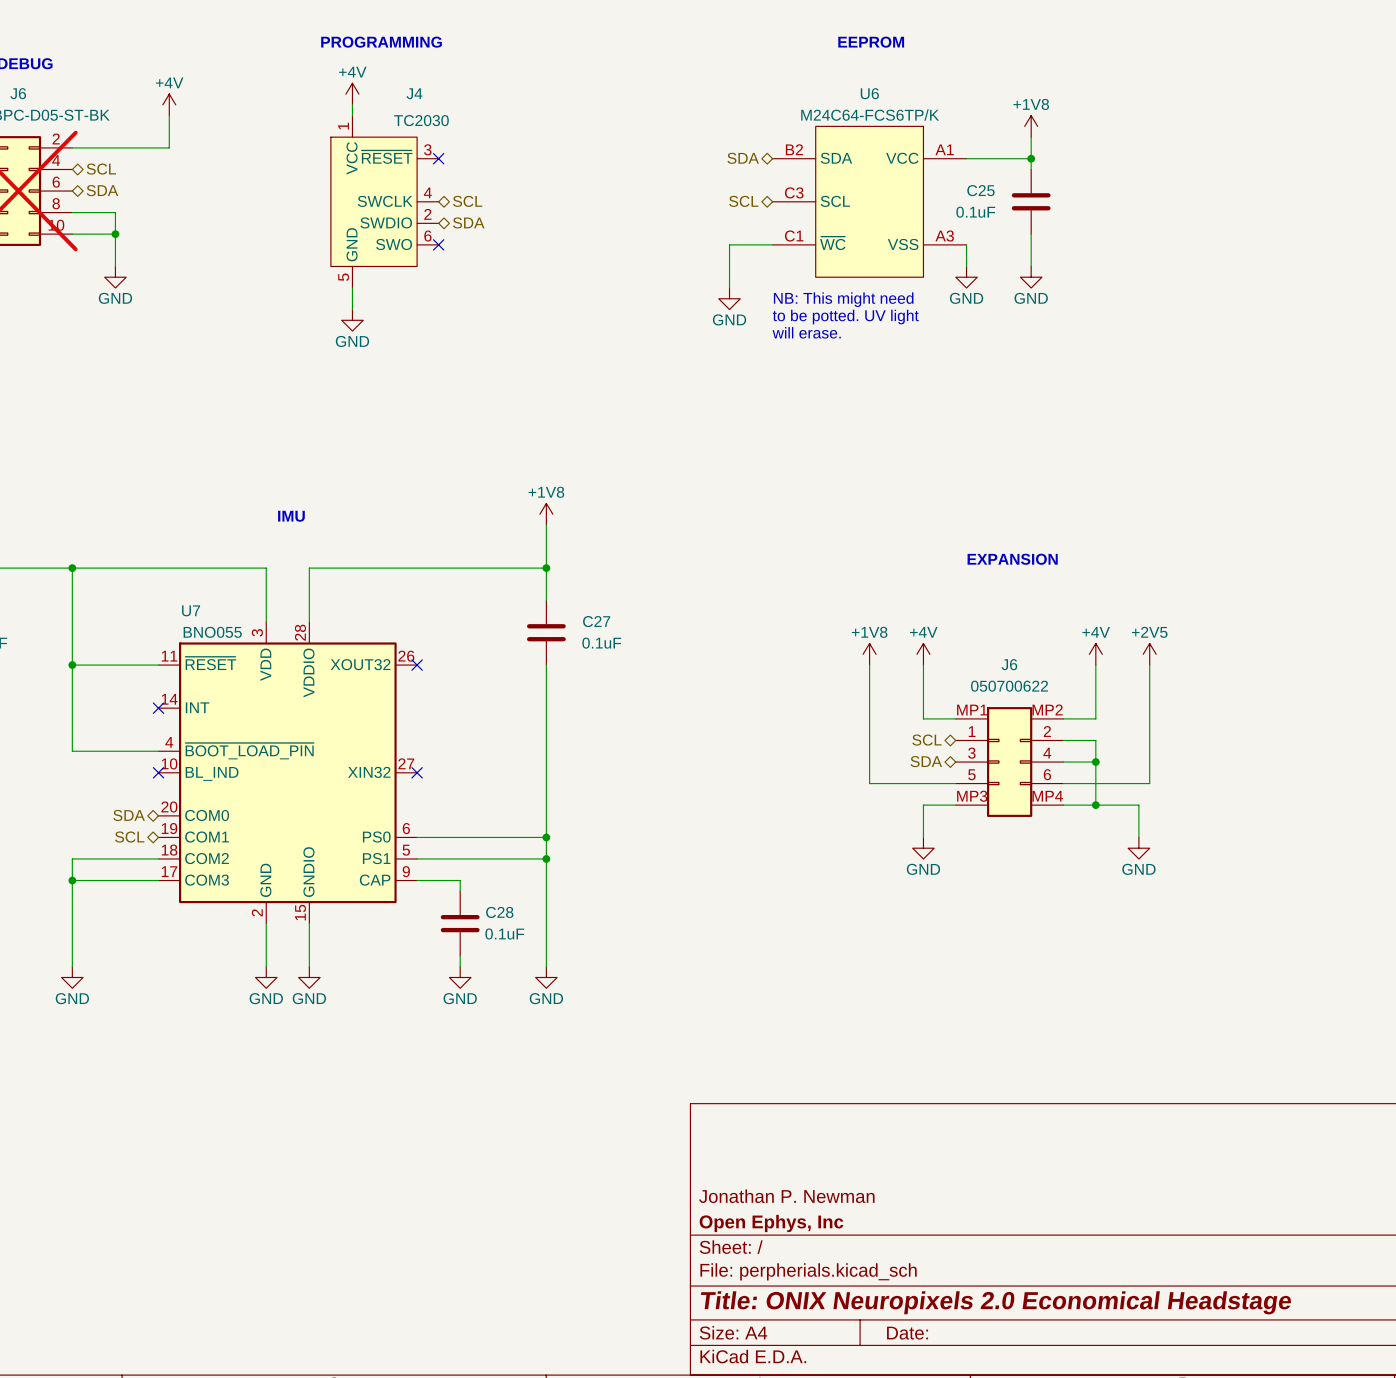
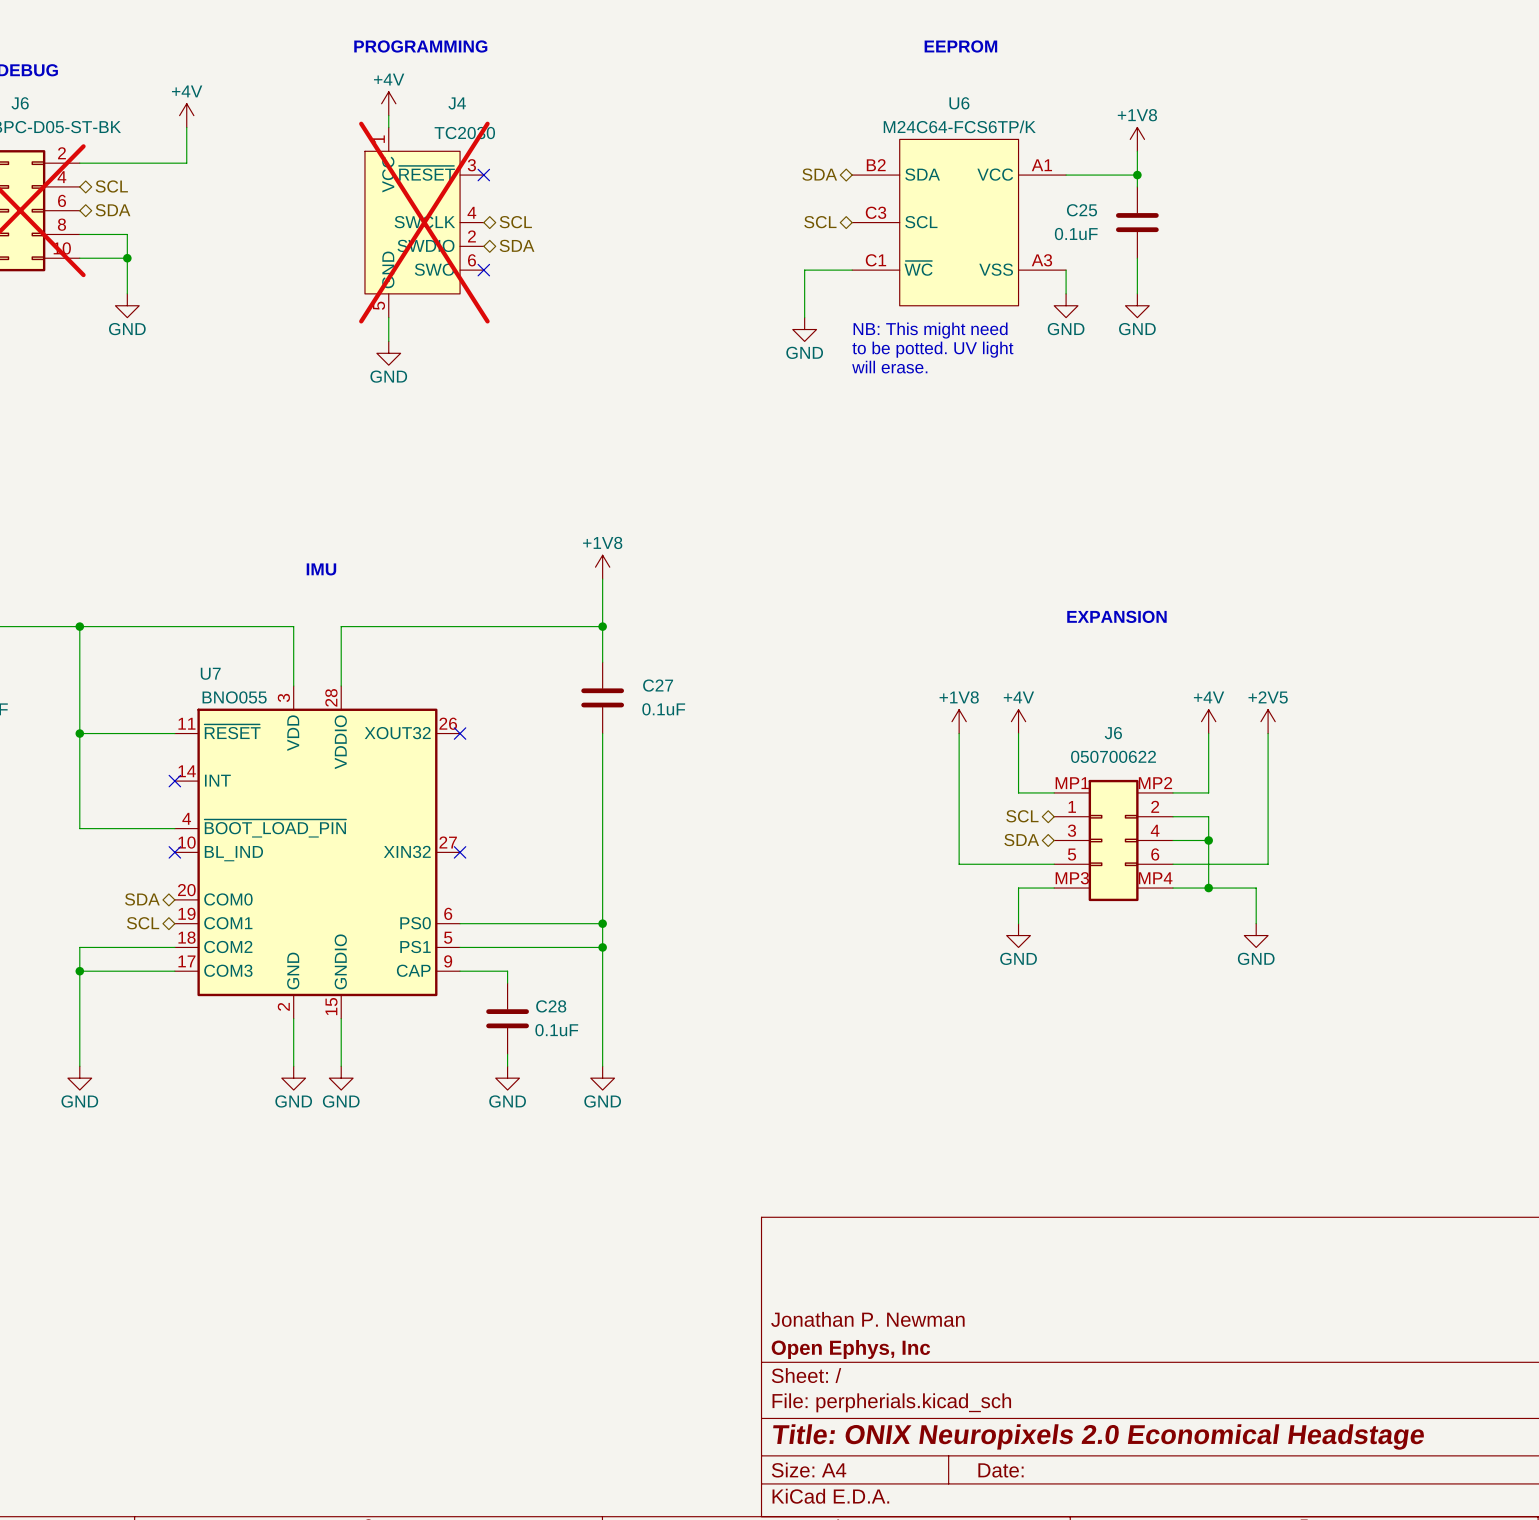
J4 do-not-place cross: none -> (424, 222)

